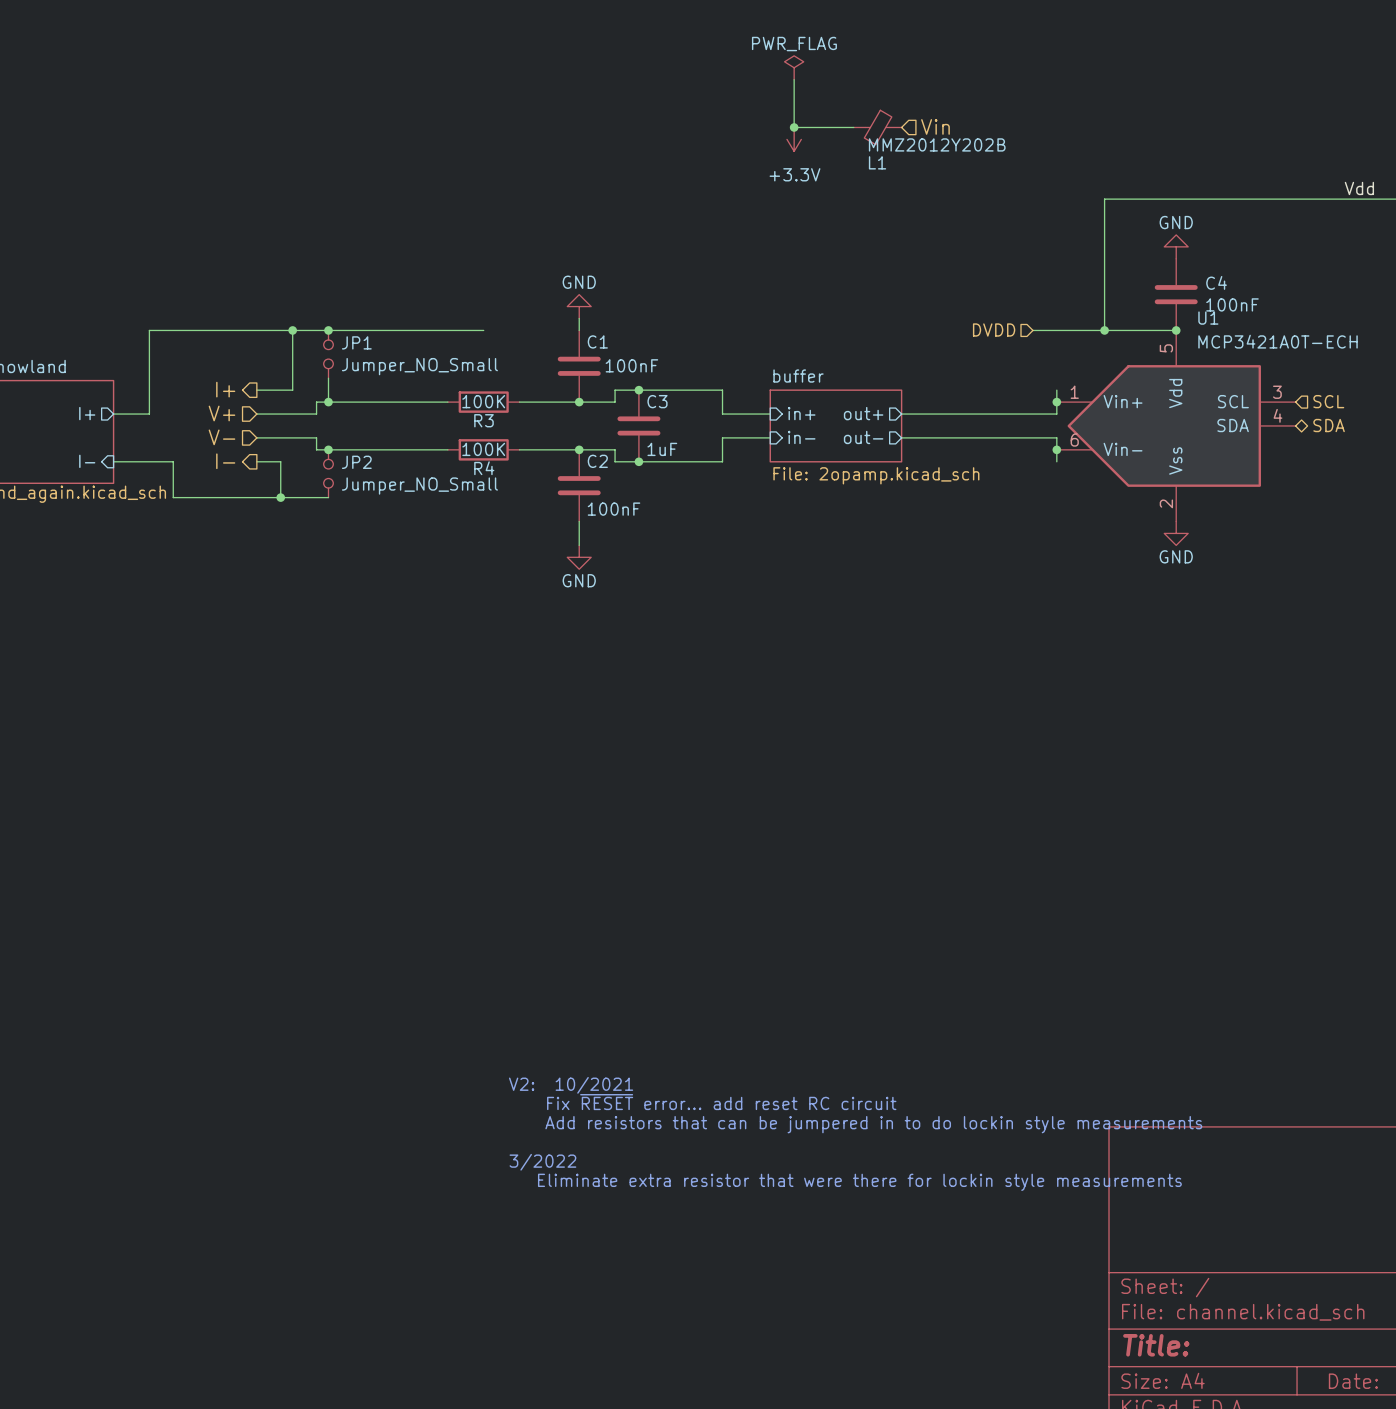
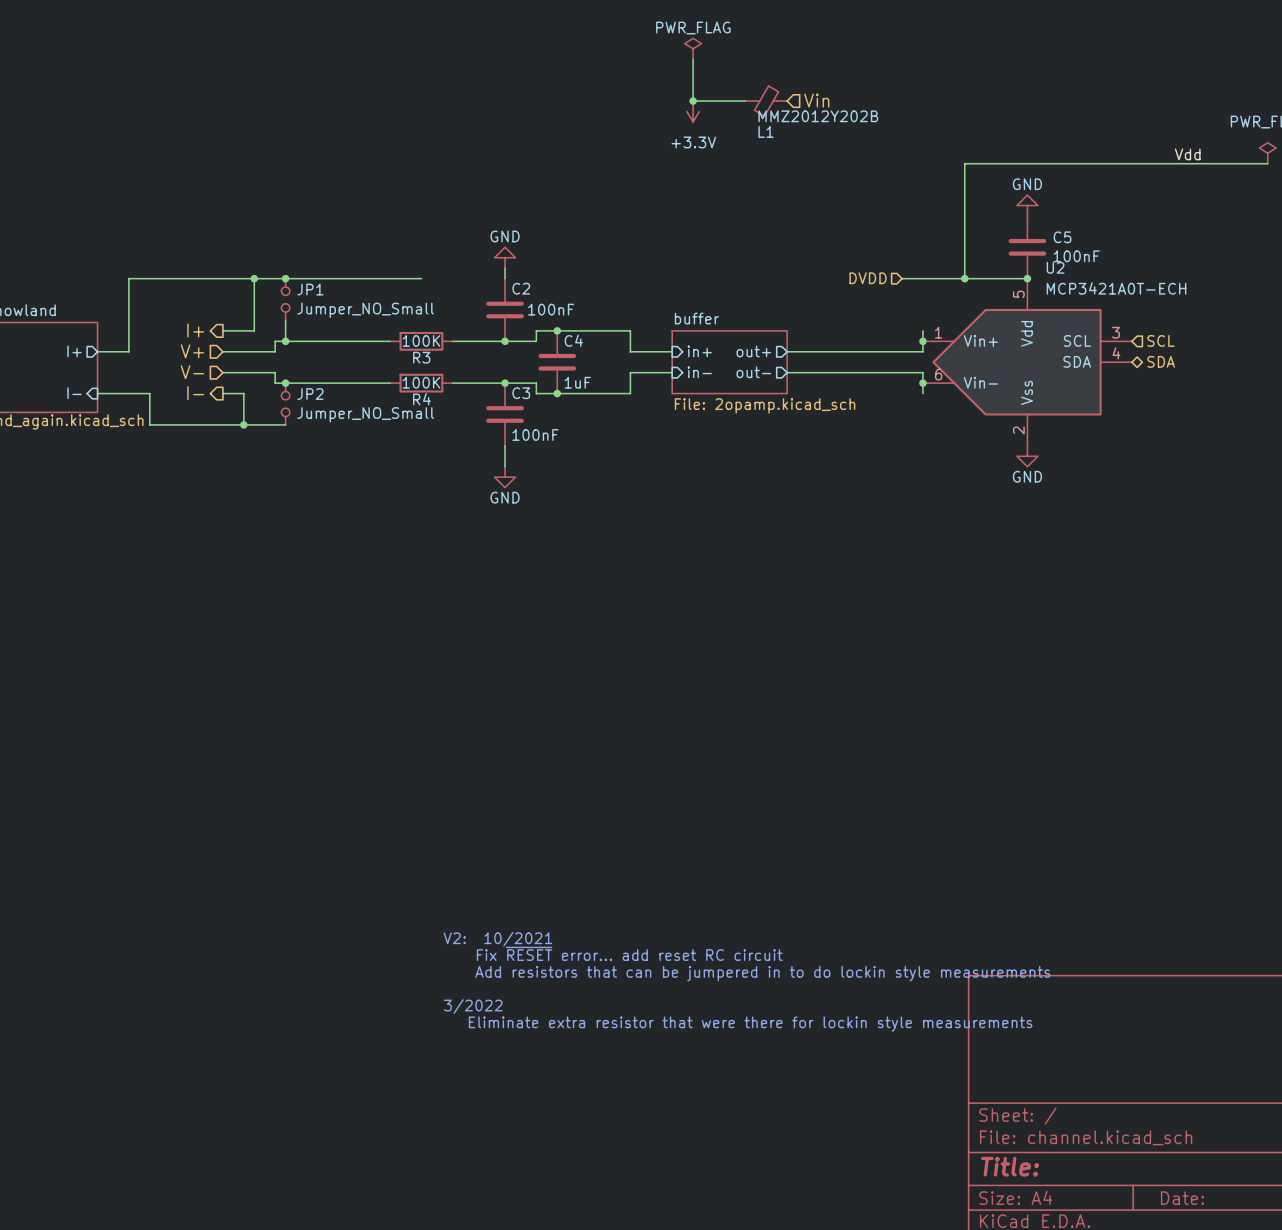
C4 name: C4 (1216, 282) -> C5 (1062, 237)
U1 name: U1 (1208, 318) -> U2 (1055, 267)
C1 name: C1 (597, 341) -> C2 (521, 288)
C3 name: C3 (657, 401) -> C4 (573, 340)
C2 name: C2 (597, 461) -> C3 (521, 393)

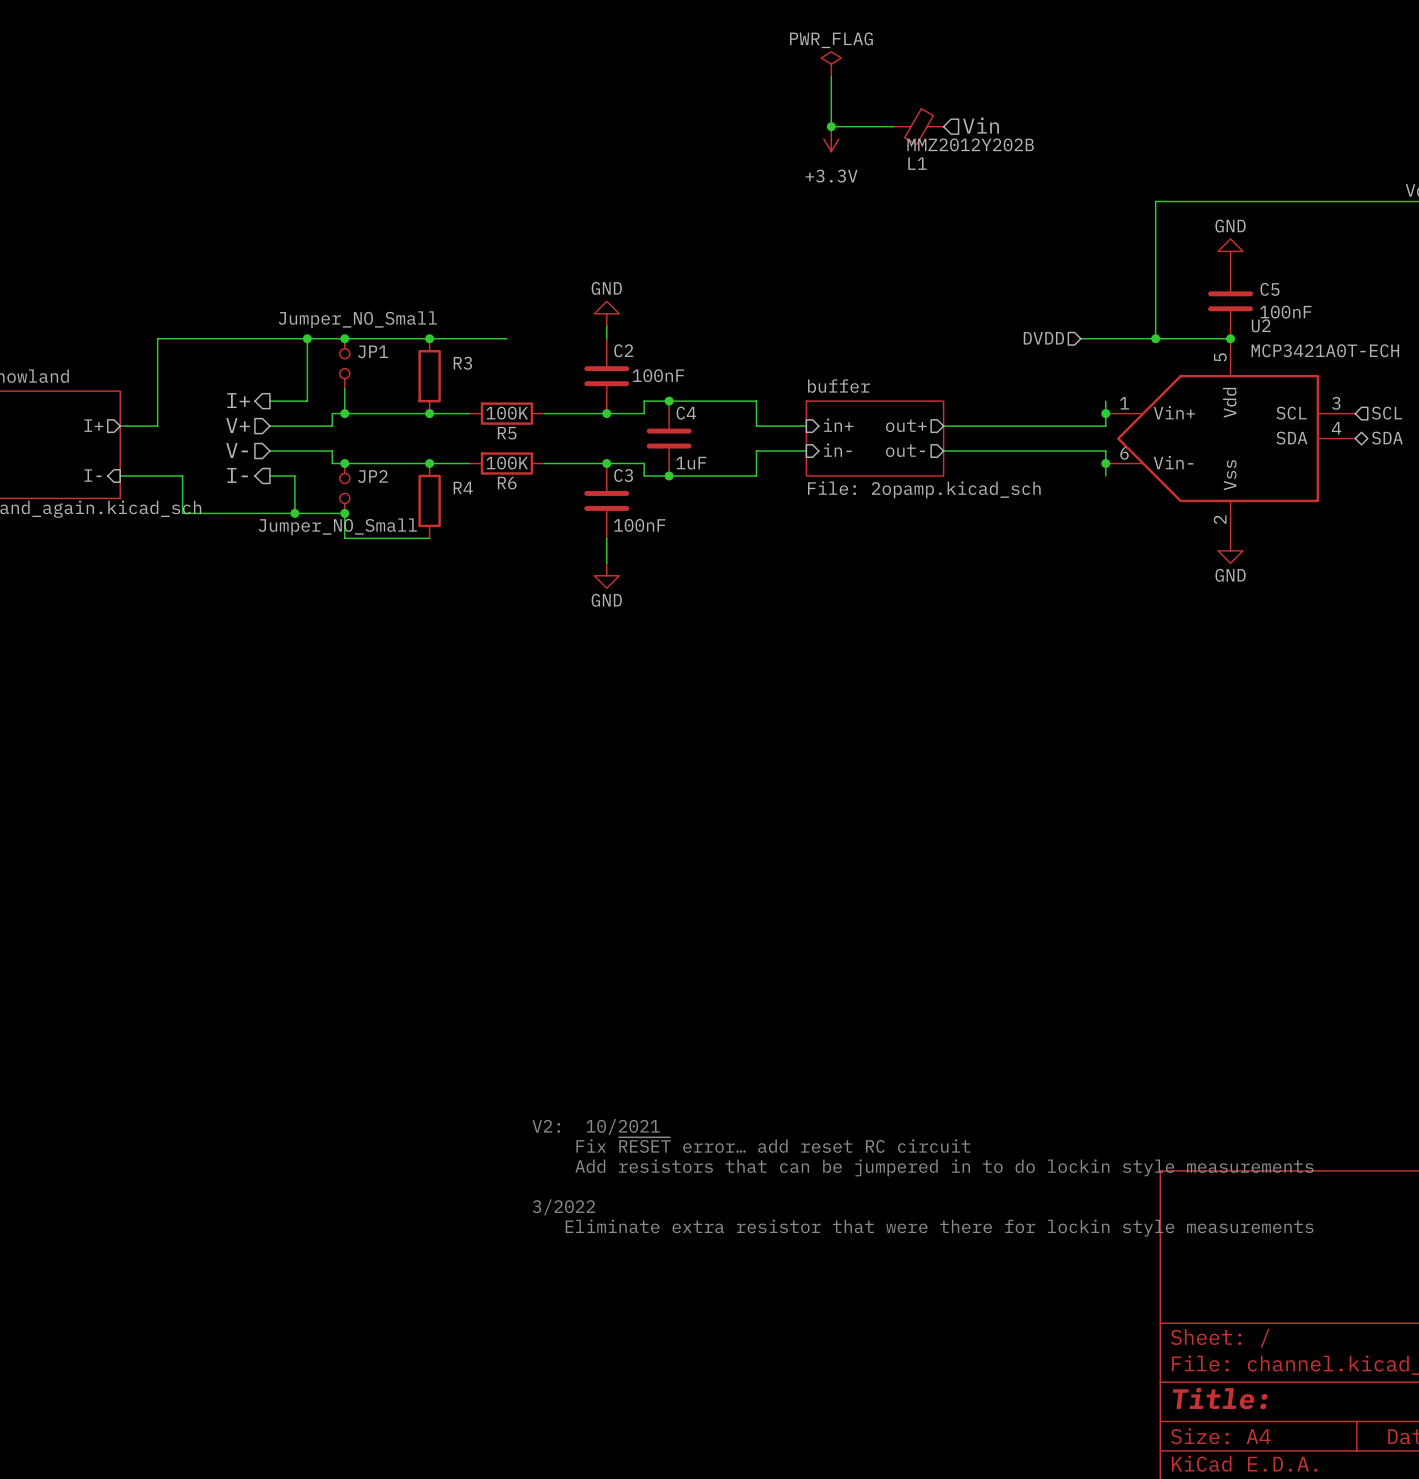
junction: none -> (429, 338)
R3: none -> (429, 376)
JP1 value position: Jumper_NO_Small (365, 310) -> Jumper_NO_Small (357, 319)
junction: none -> (429, 413)
R3 name: R3 (421, 357) -> R5 (507, 433)
junction: none -> (429, 463)
R4 name: R4 (421, 399) -> R6 (507, 483)
R4: none -> (429, 500)
JP2 value position: Jumper_NO_Small (365, 414) -> Jumper_NO_Small (337, 526)
wire: none -> (344, 513) (344, 538) (429, 538)
junction: none -> (344, 513)

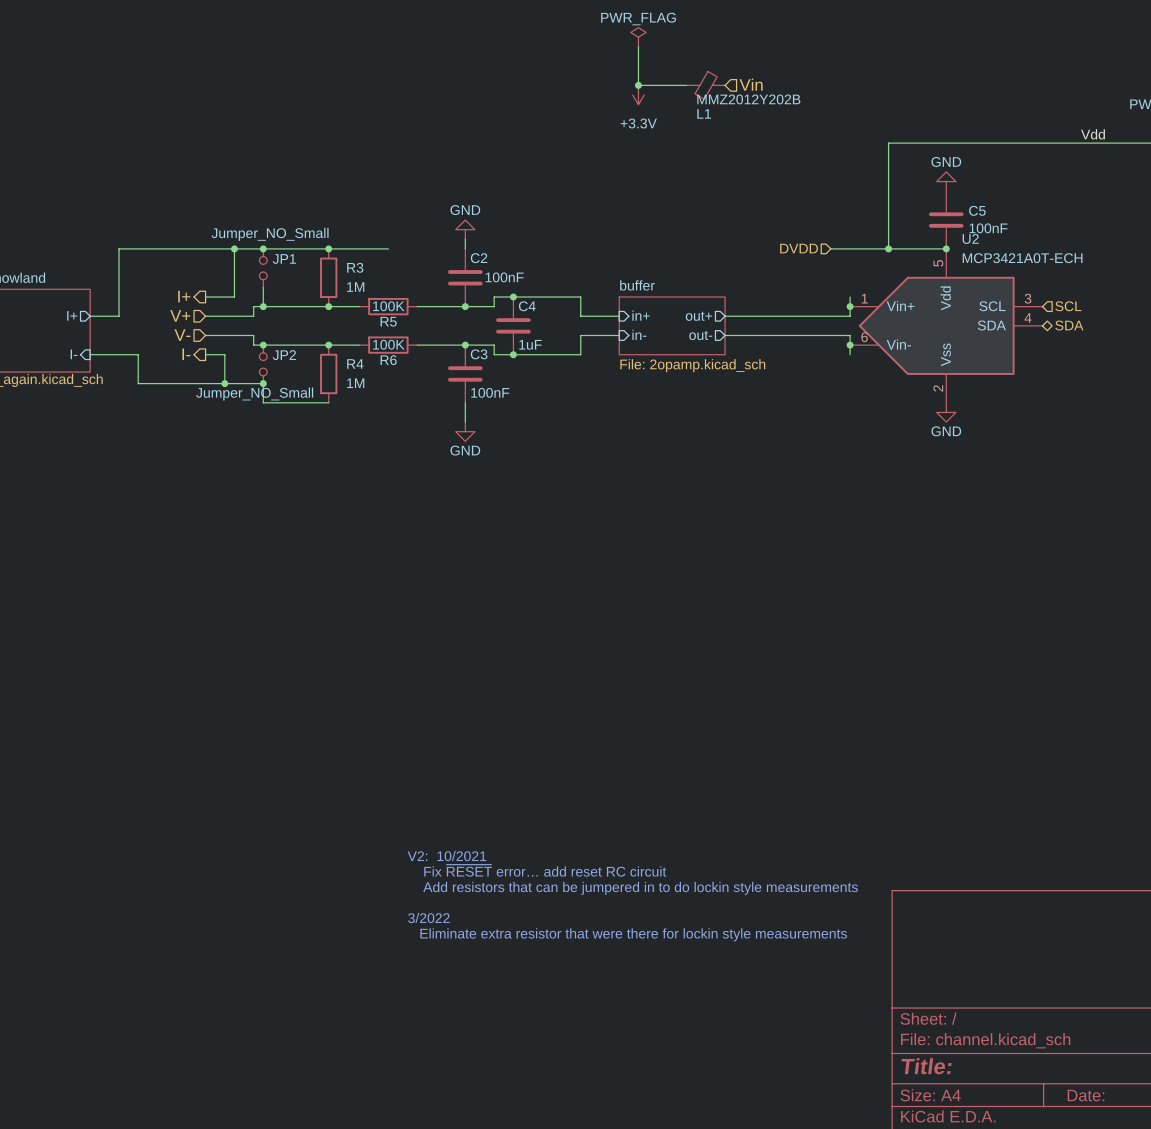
R3 value: none -> 1M (355, 287)
R4 value: none -> 1M (355, 383)

